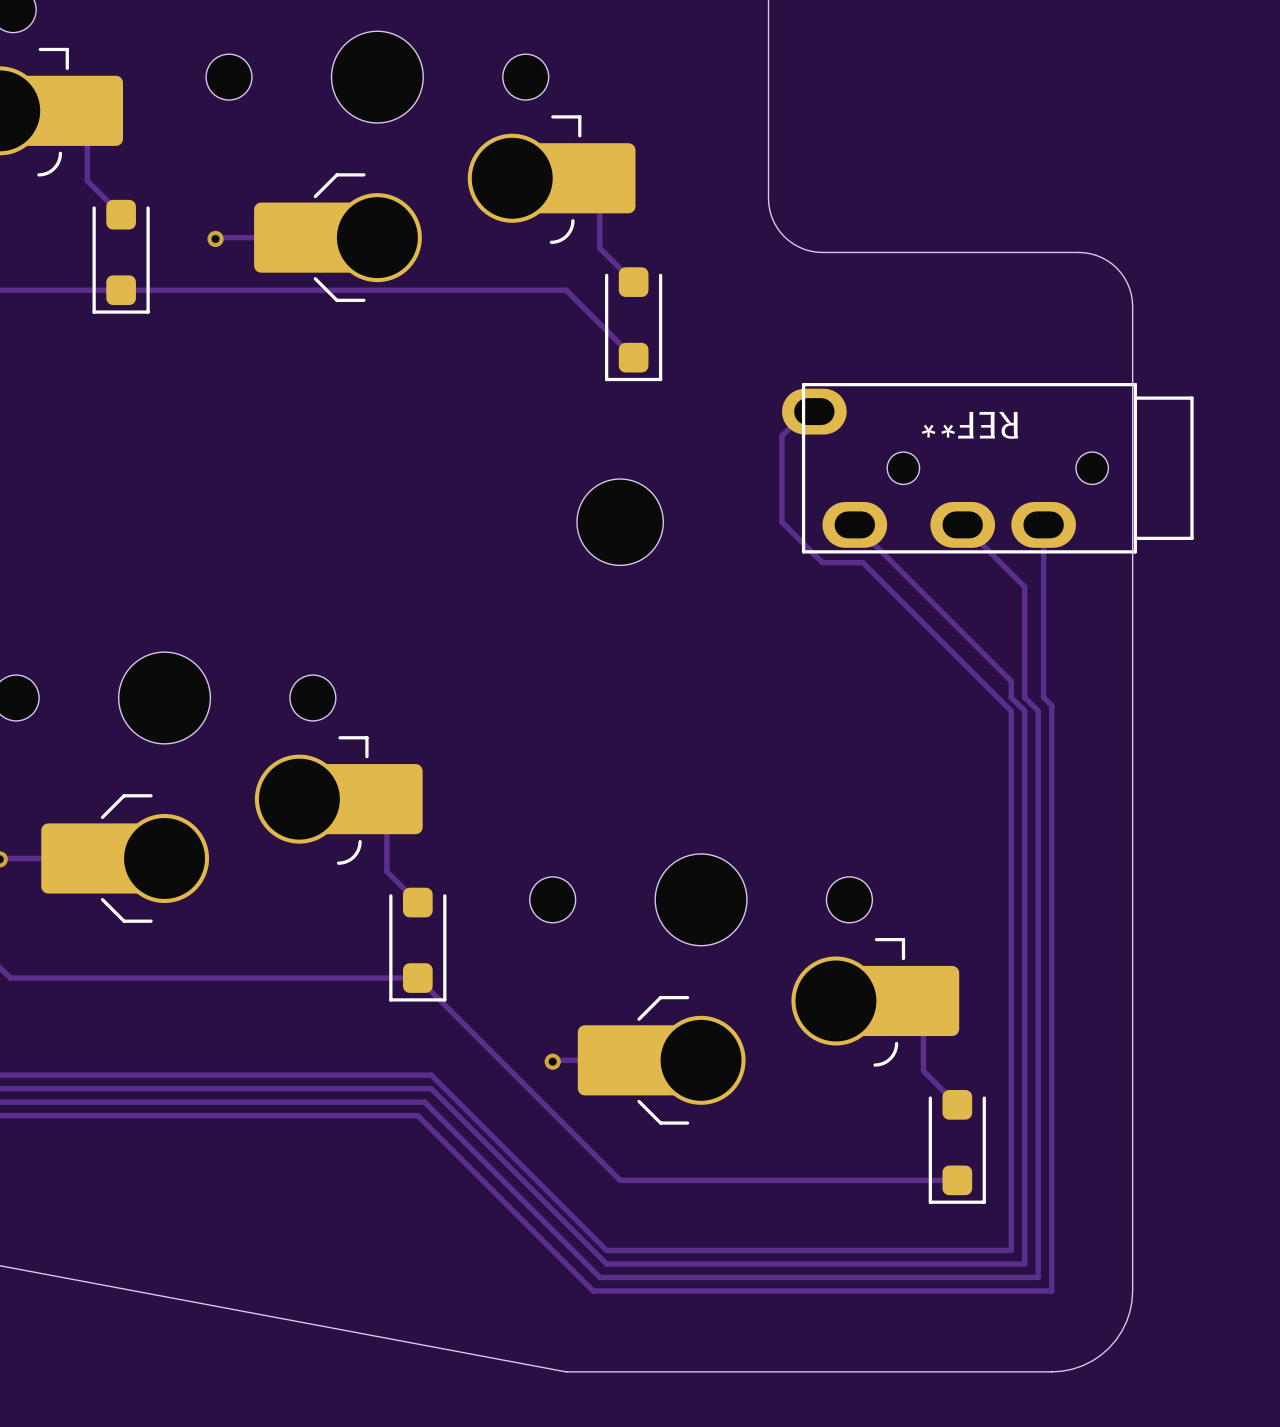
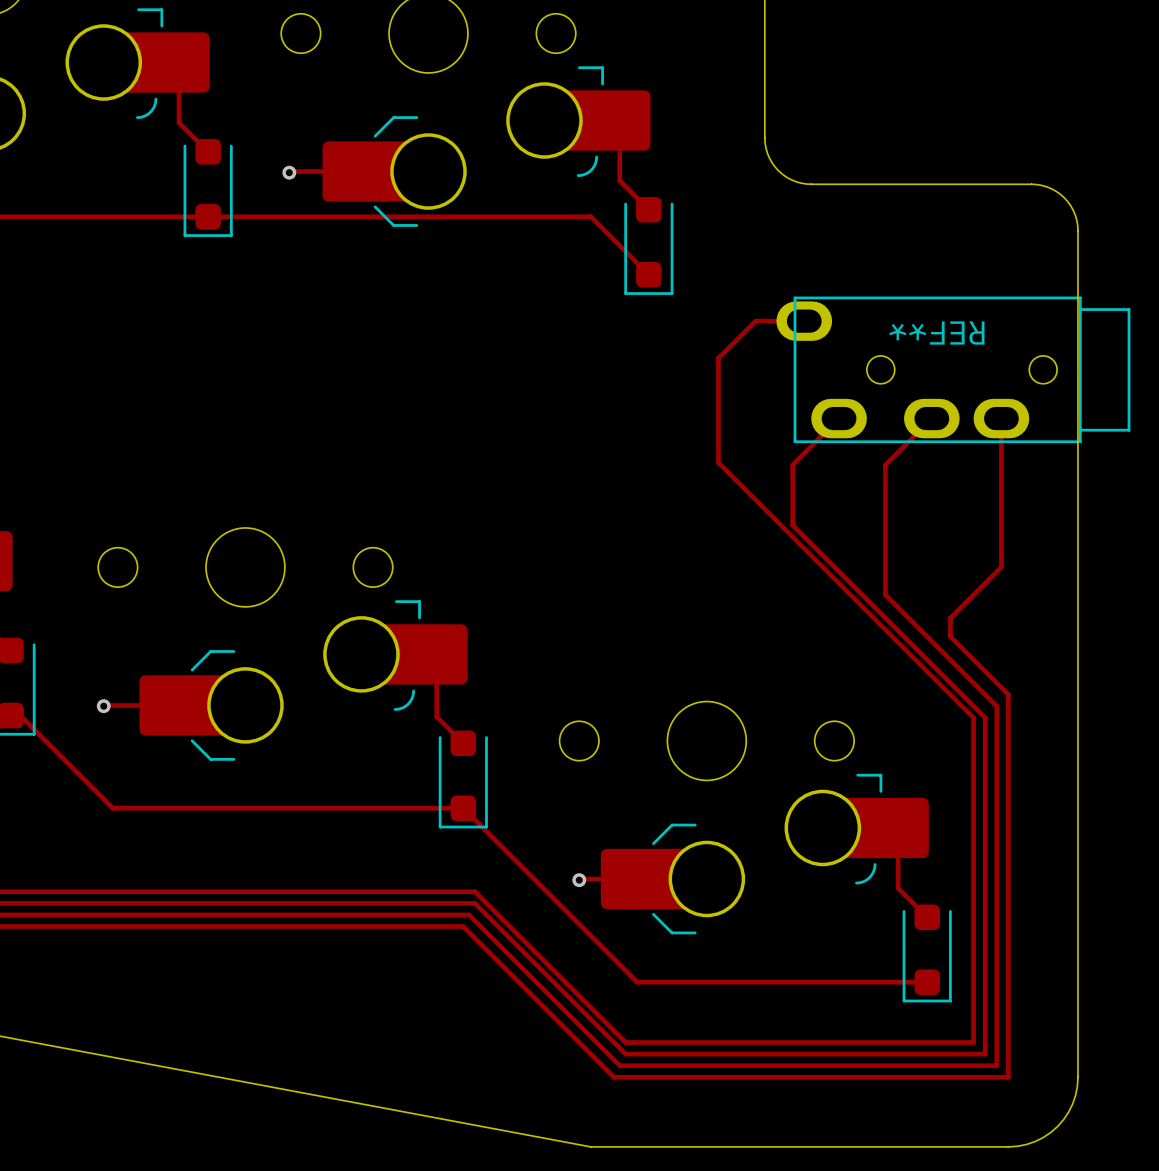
track: (806, 411) (781, 435) (781, 522) (822, 562) (862, 562) (1011, 711) (1011, 872) -> (797, 321) (755, 321) (718, 358) (718, 462) (973, 717)
part: (620, 522) -> none
track: (854, 524) (1011, 681) (1011, 697) (1024, 711) (1024, 872) -> (839, 418) (792, 464) (792, 525) (985, 717)
track: (962, 524) (1024, 586) (1024, 697) (1038, 711) (1038, 859) -> (931, 418) (885, 464) (885, 594) (996, 706)
track: (1043, 697) (1051, 705) (1051, 845) -> (1001, 567) (950, 618) (950, 636) (1008, 694)

